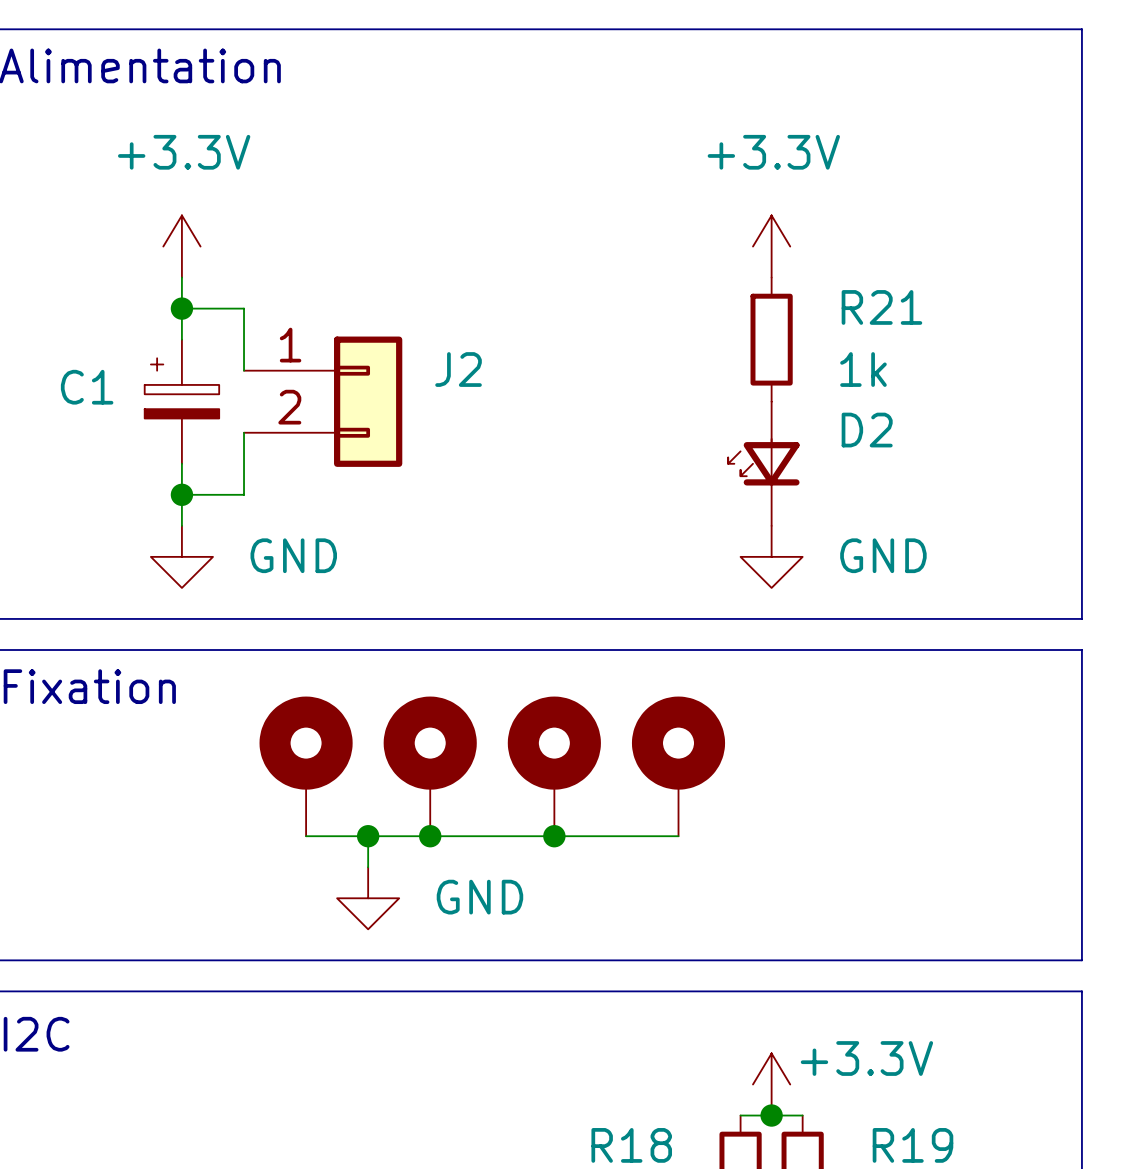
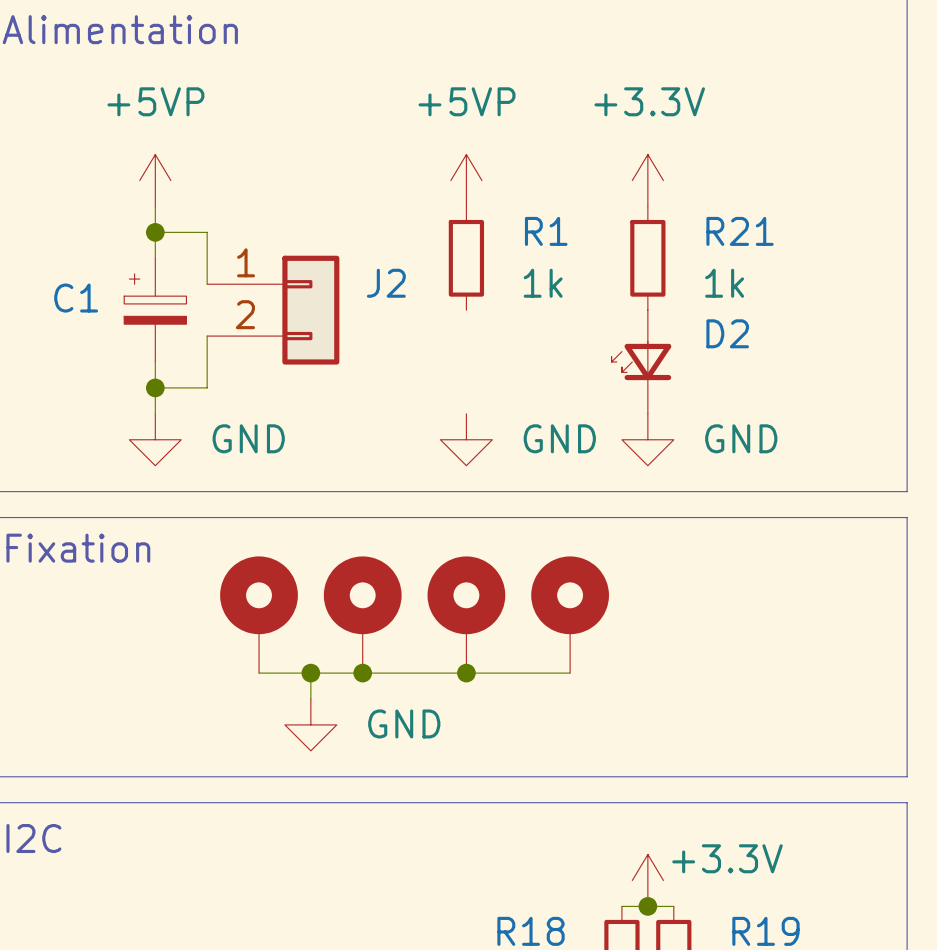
power symbol: +3.3V (181, 246) -> +5VP (155, 180)
power symbol: none -> +5VP (466, 180)
R1: none -> 1k (466, 258)
power symbol: none -> GND (466, 439)

